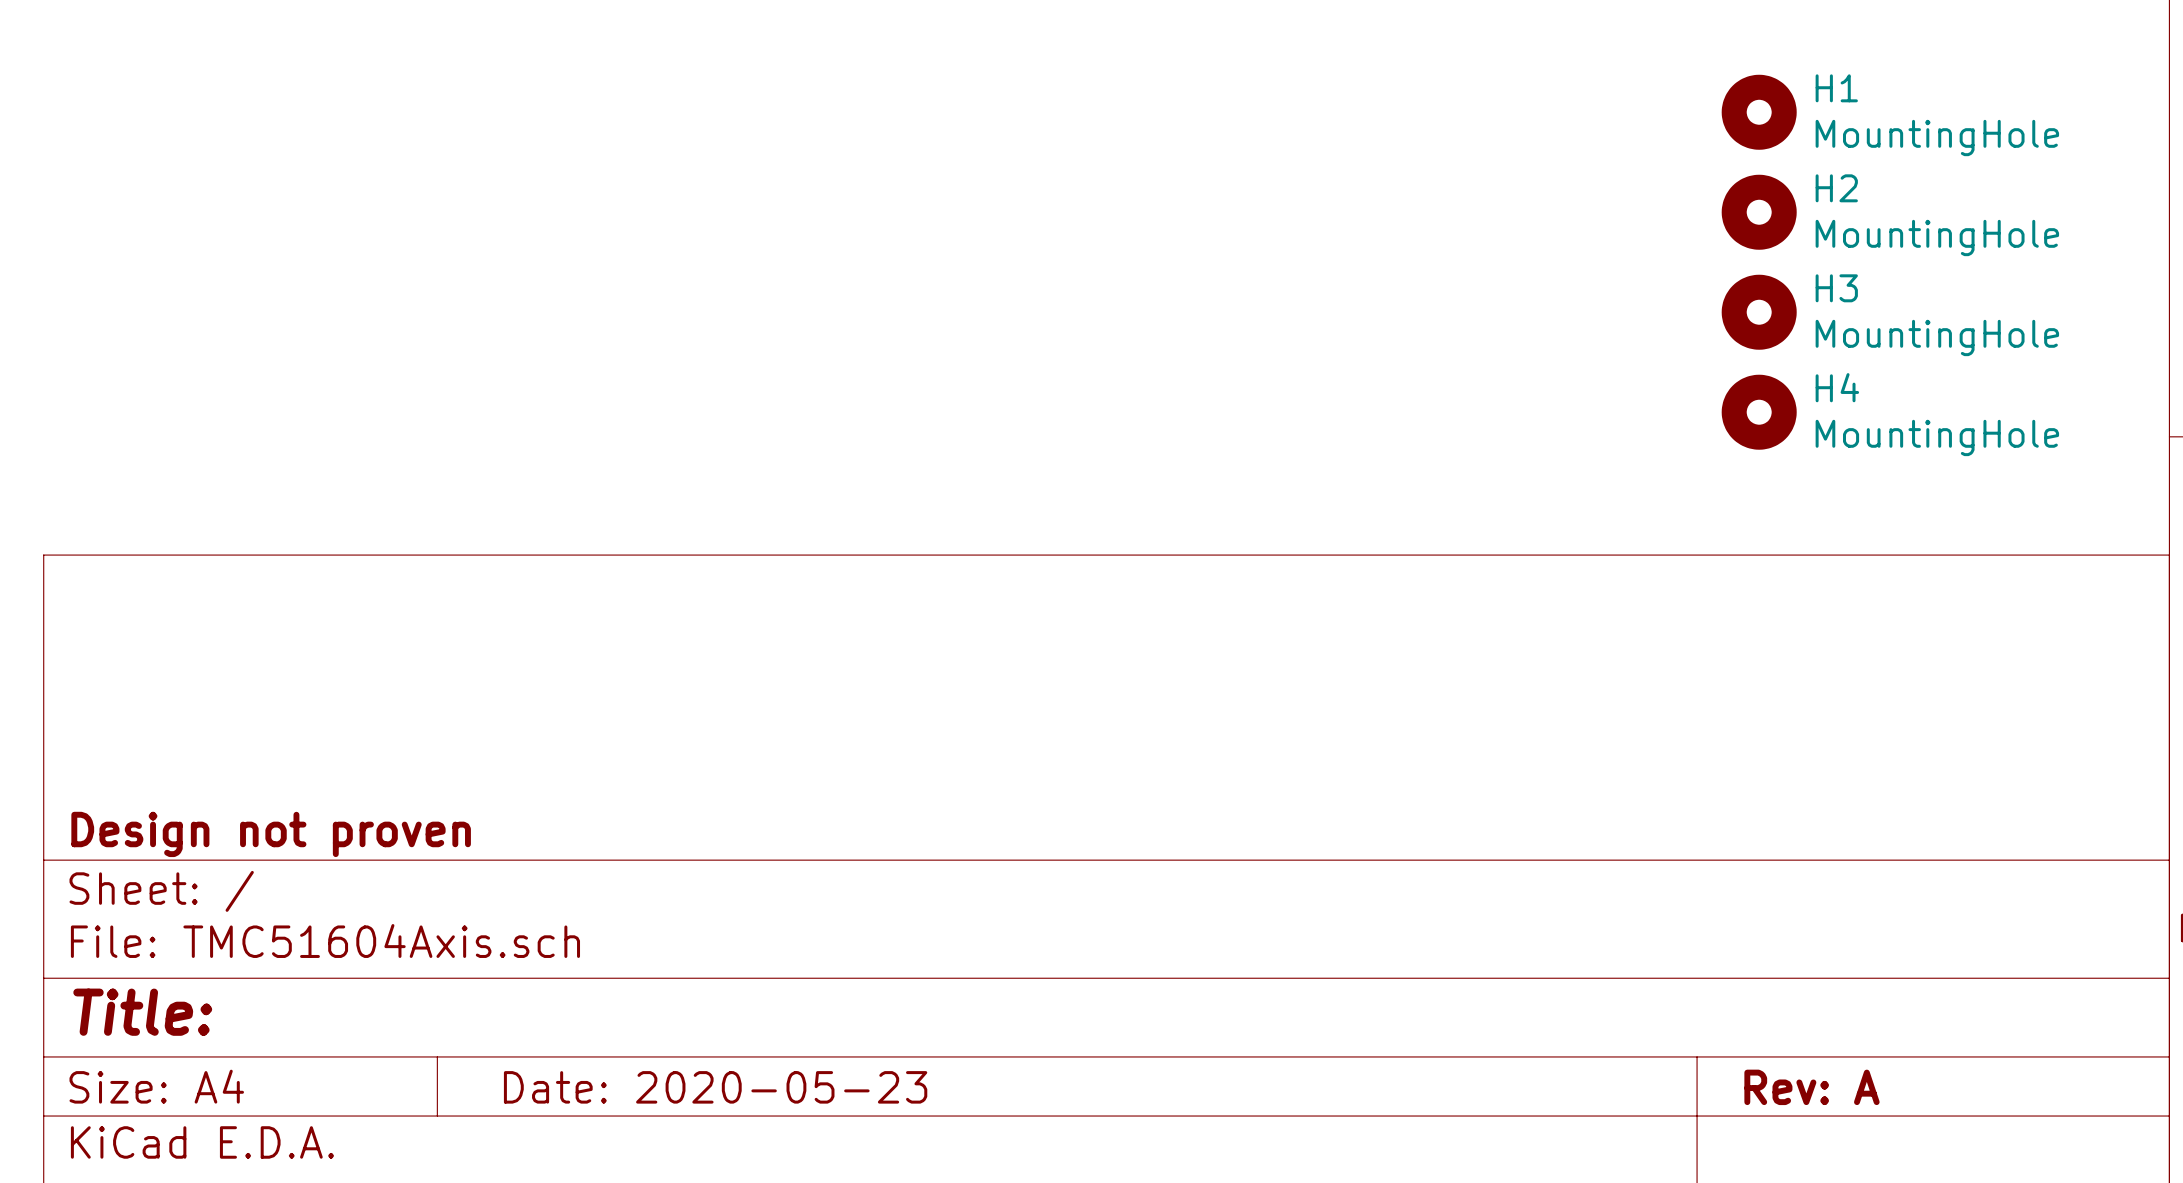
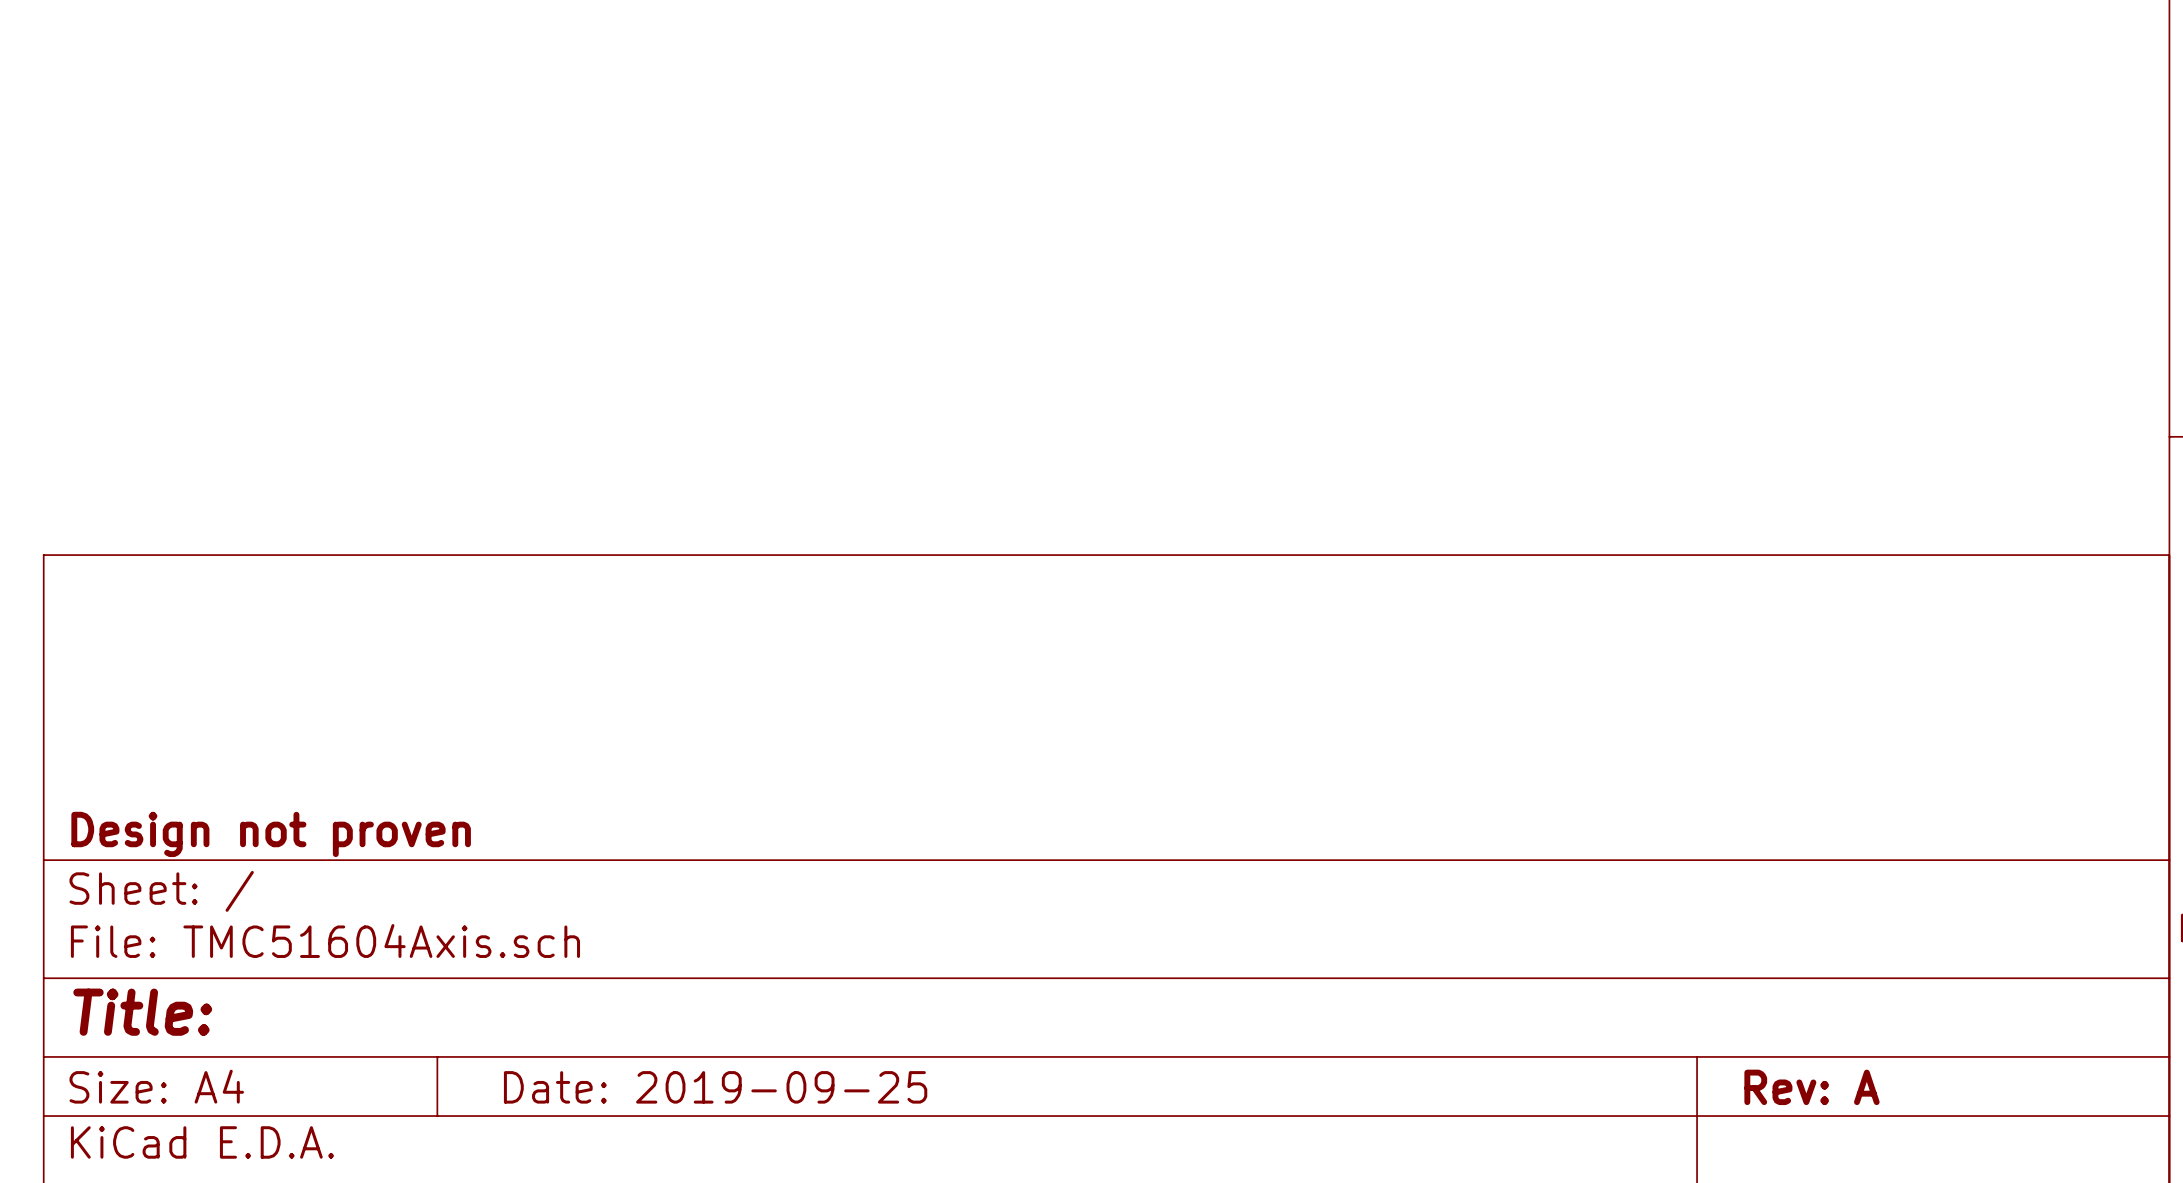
H1: MountingHole (1759, 112) -> none
H2: MountingHole (1759, 212) -> none
H3: MountingHole (1759, 312) -> none
H4: MountingHole (1759, 412) -> none
title block: Date: 2020-05-23 (715, 1087) -> Date: 2019-09-25 (715, 1087)

